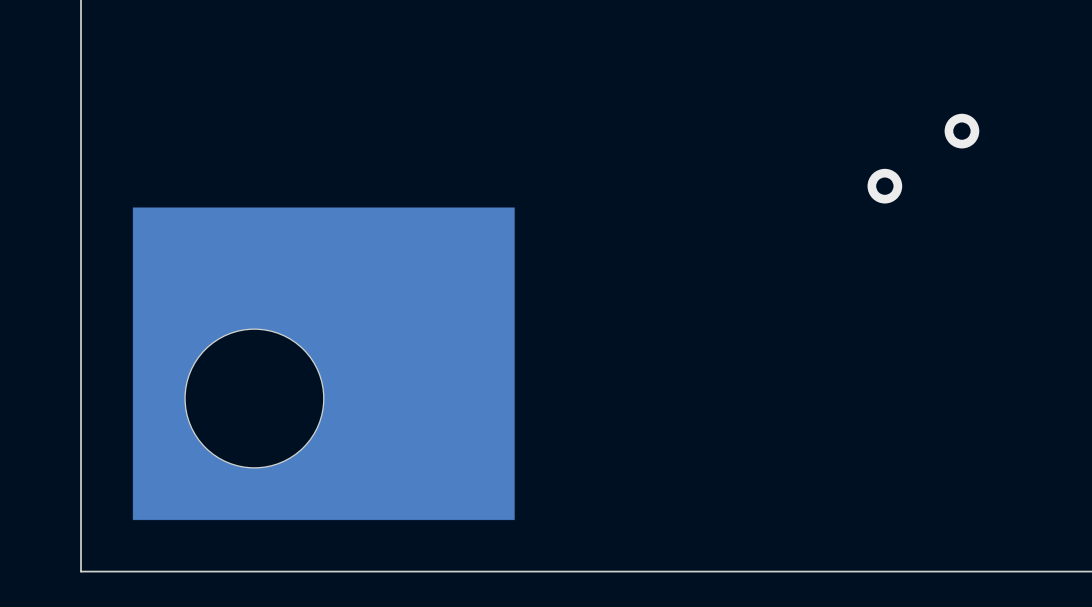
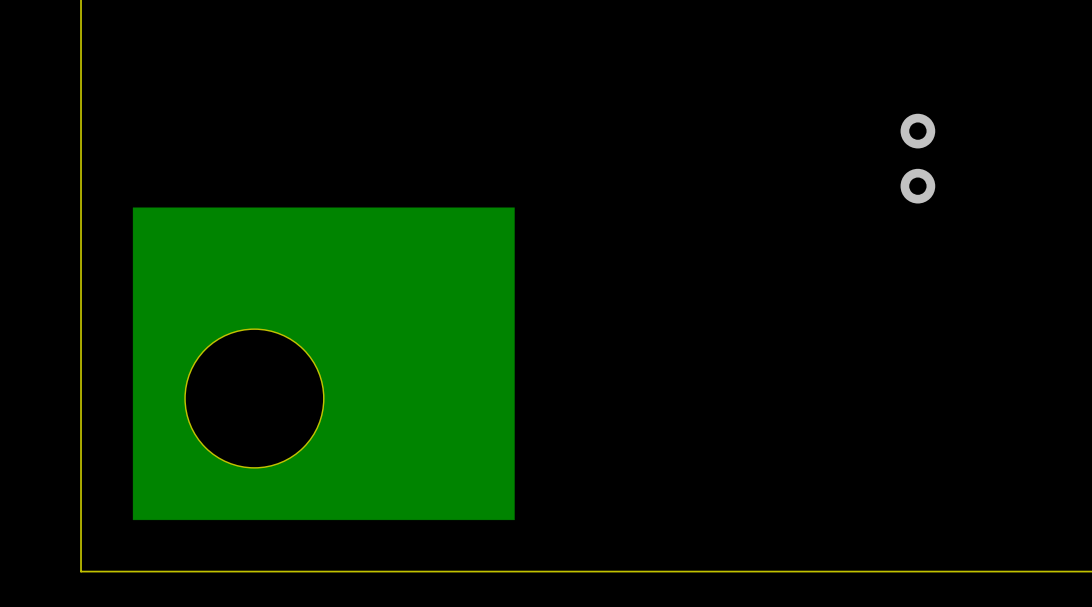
via: none -> (917, 131)
via: (961, 131) -> none
via position: (884, 186) -> (917, 186)

